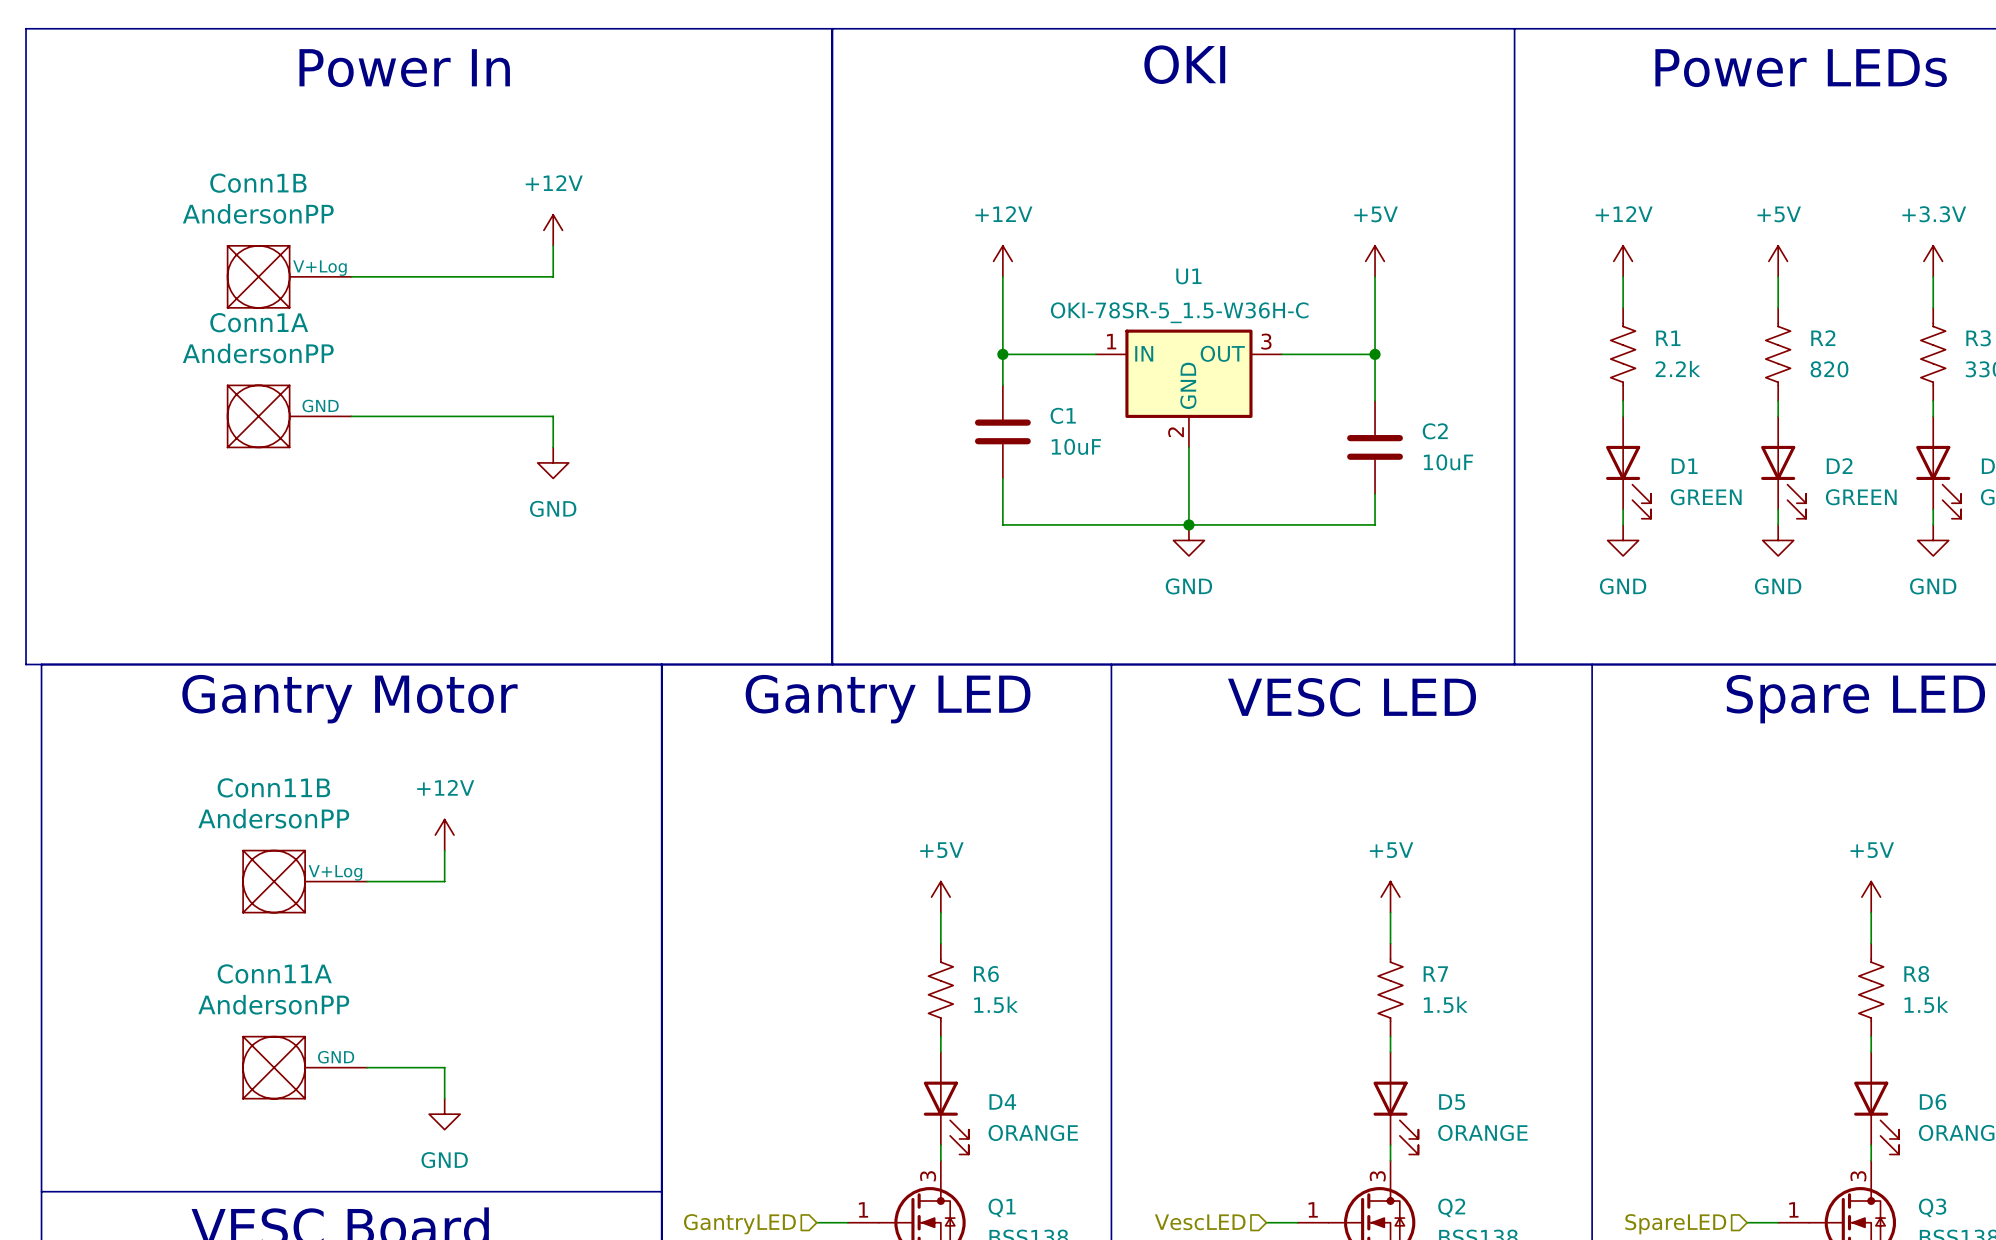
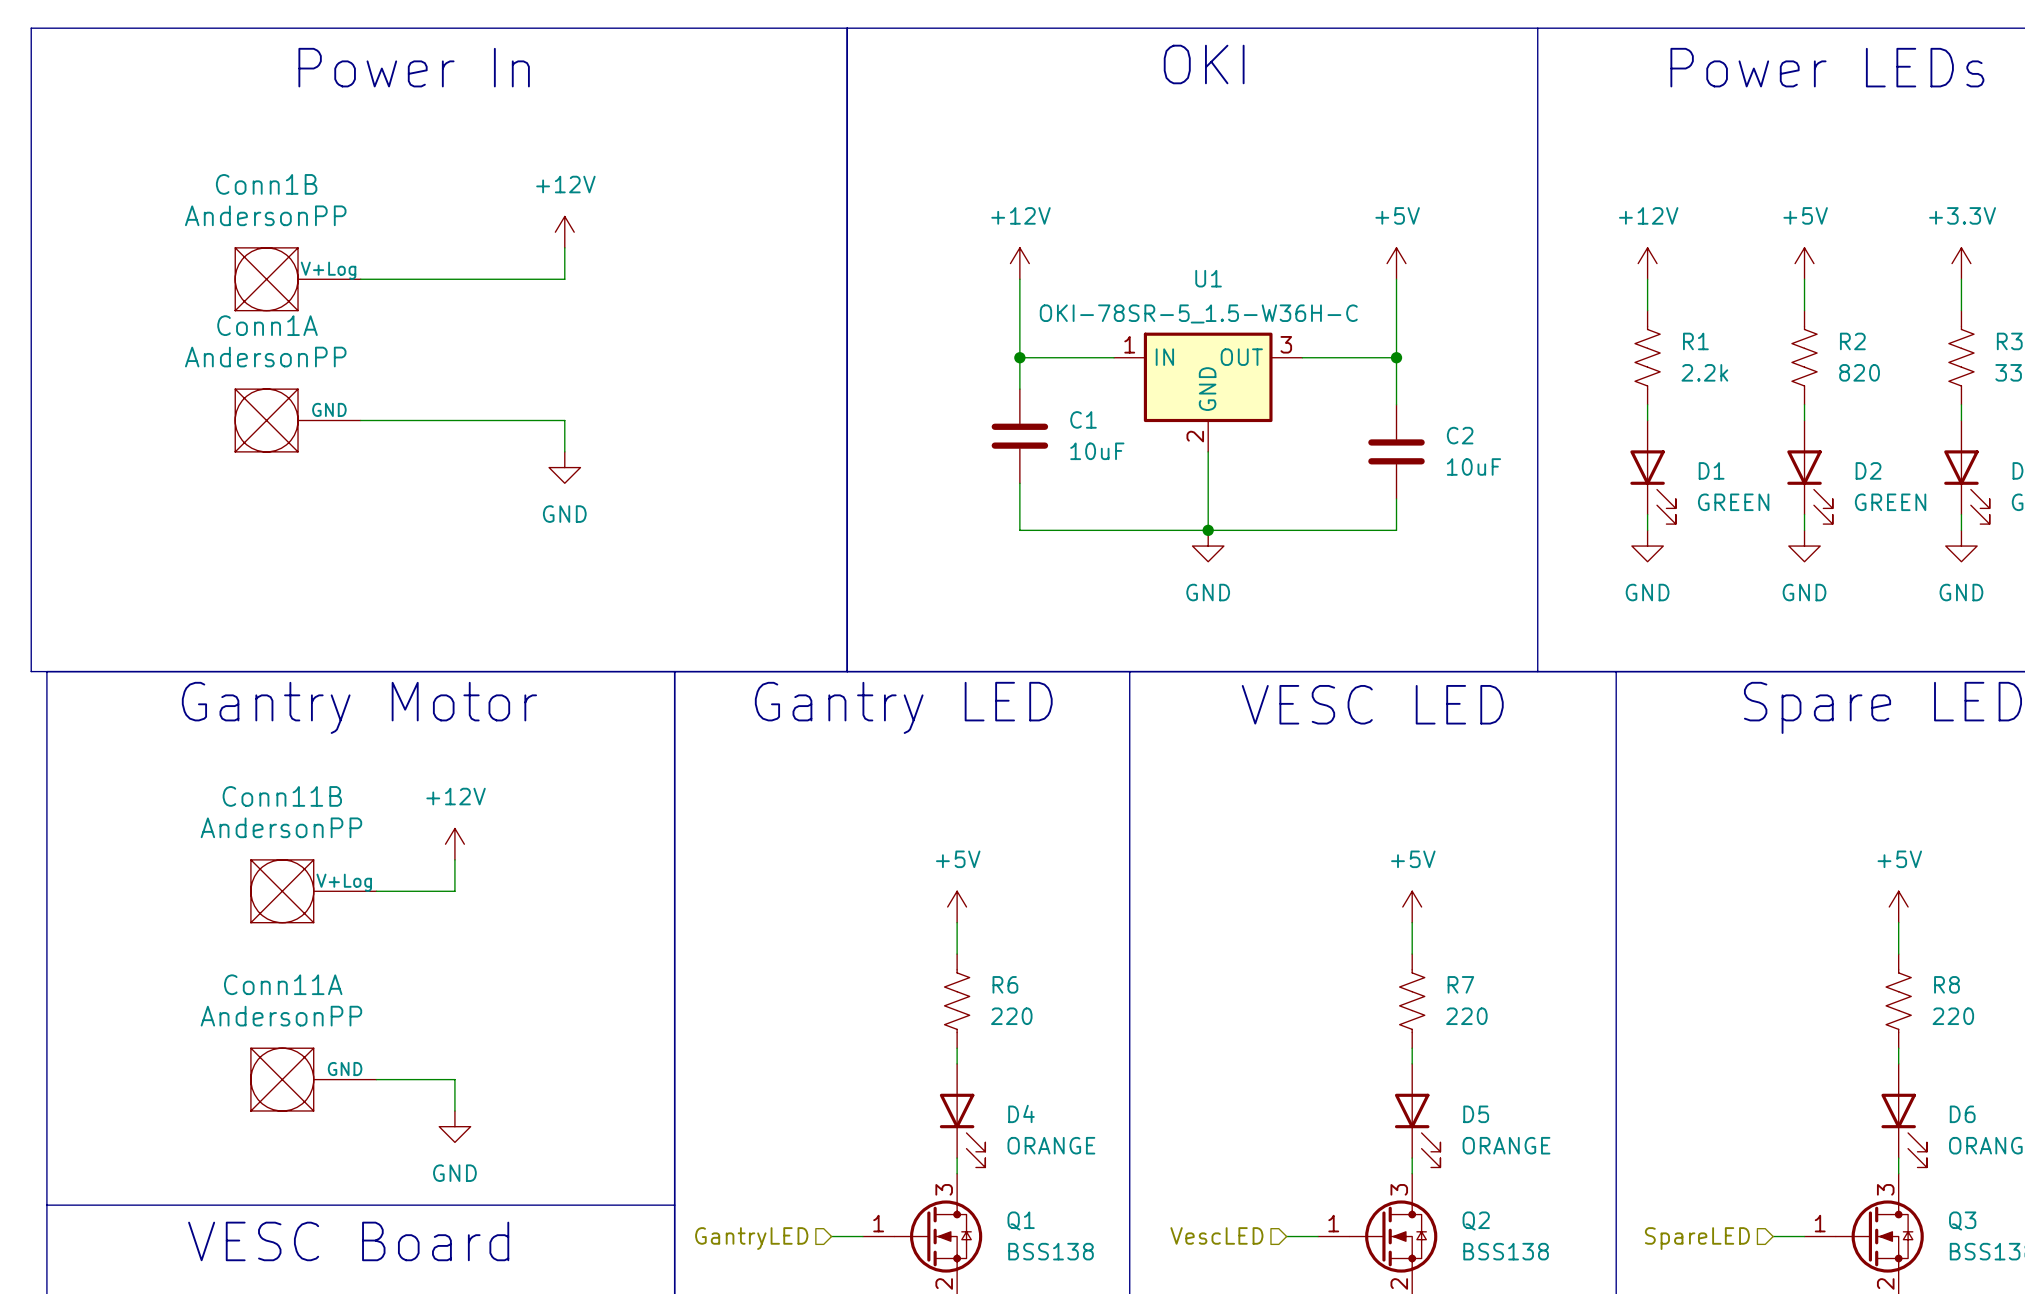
R6 value: 1.5k (996, 1004) -> 220 (1011, 1016)
R7 value: 1.5k (1445, 1004) -> 220 (1466, 1016)
R8 value: 1.5k (1926, 1004) -> 220 (1953, 1016)

